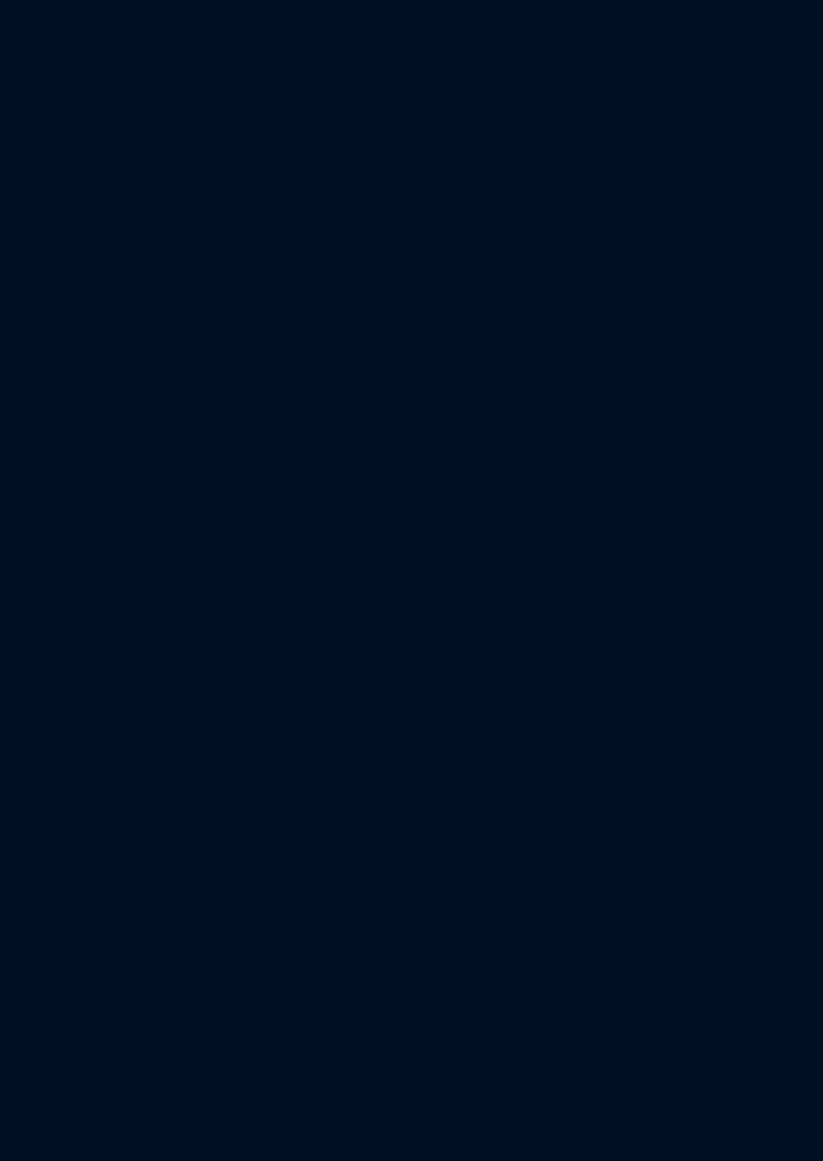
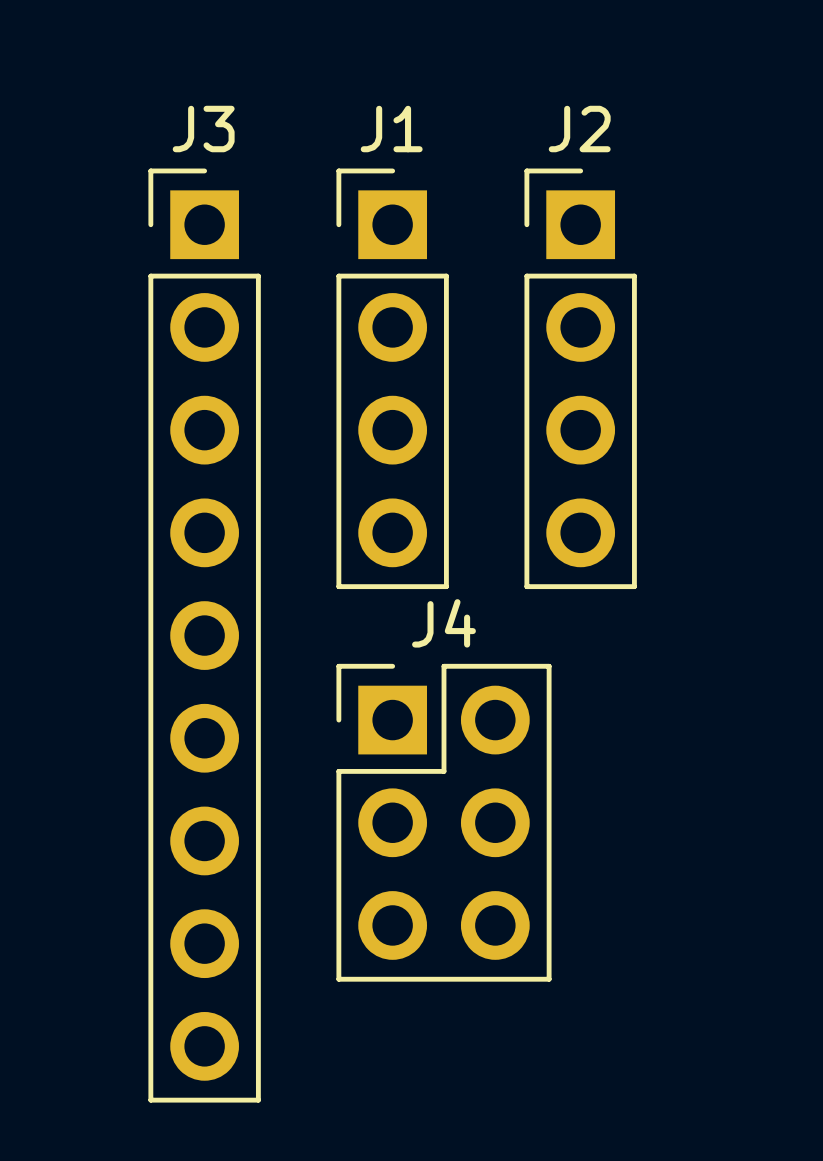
J1: none -> (392, 378)
J2: none -> (580, 378)
J3: none -> (204, 635)
J4: none -> (443, 822)

